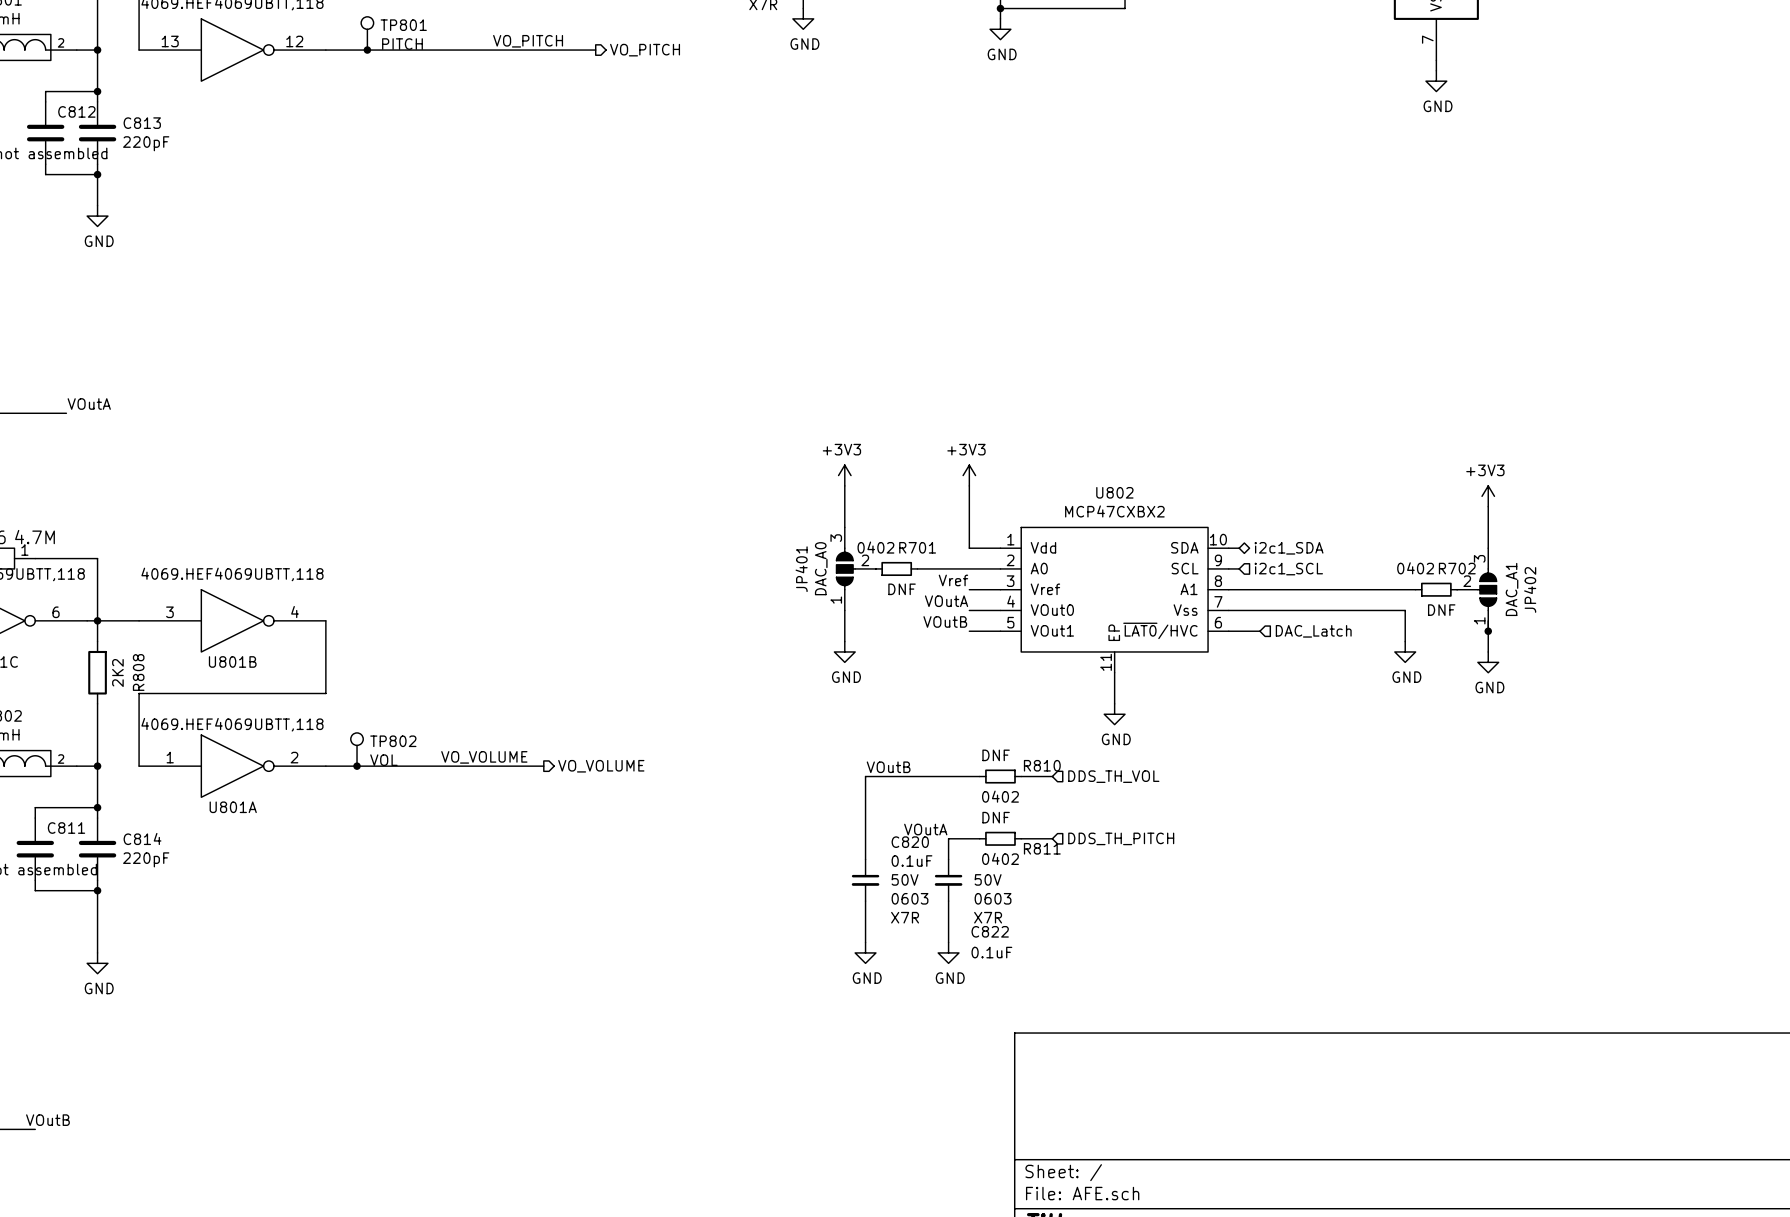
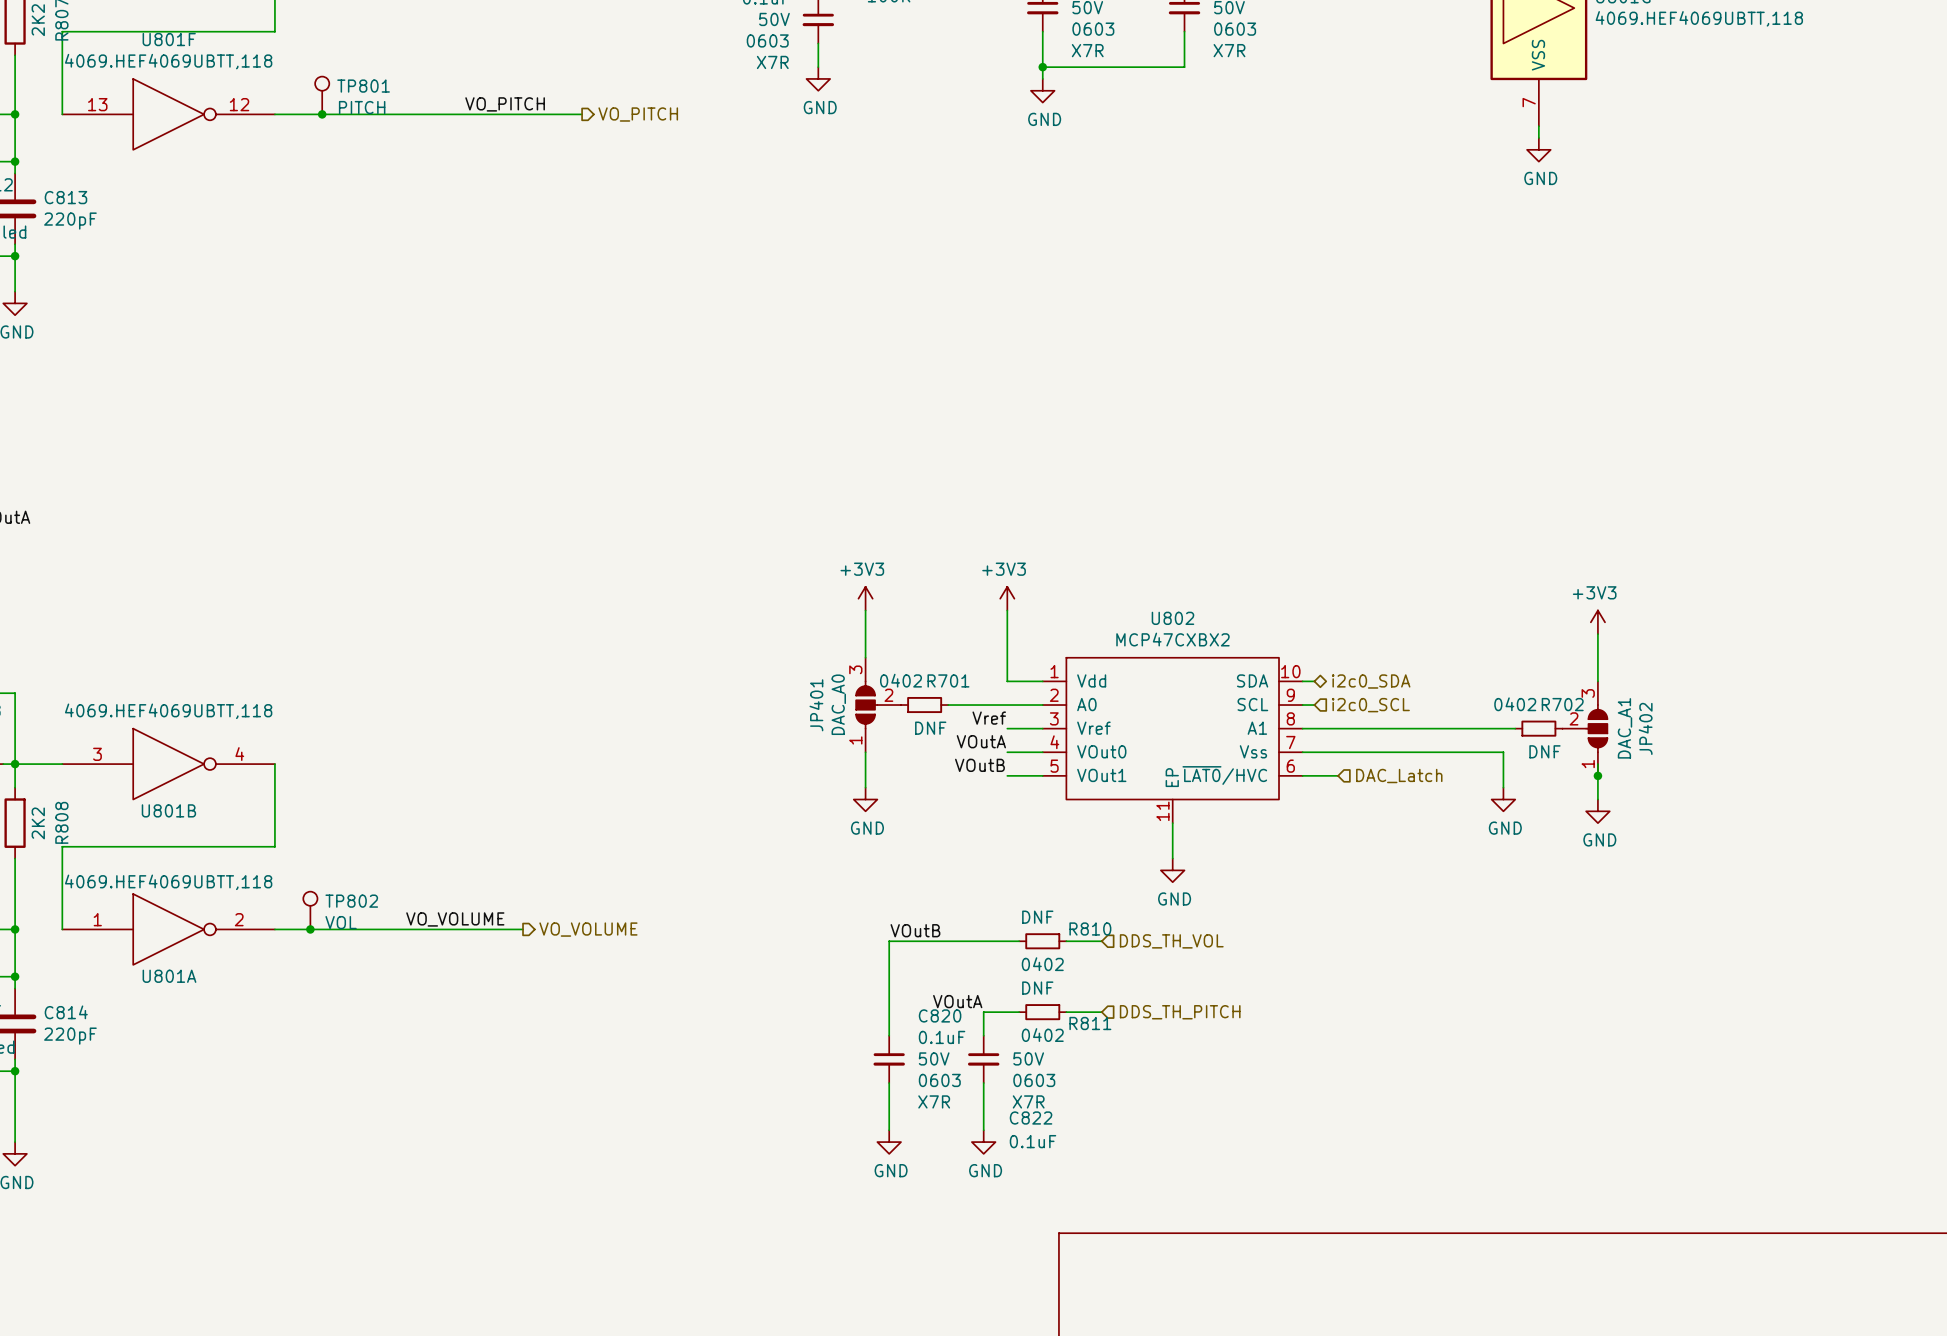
hierarchical label: i2c1_SDA (1289, 548) -> i2c0_SDA (1371, 681)
hierarchical label: i2c1_SCL (1288, 569) -> i2c0_SCL (1370, 705)

